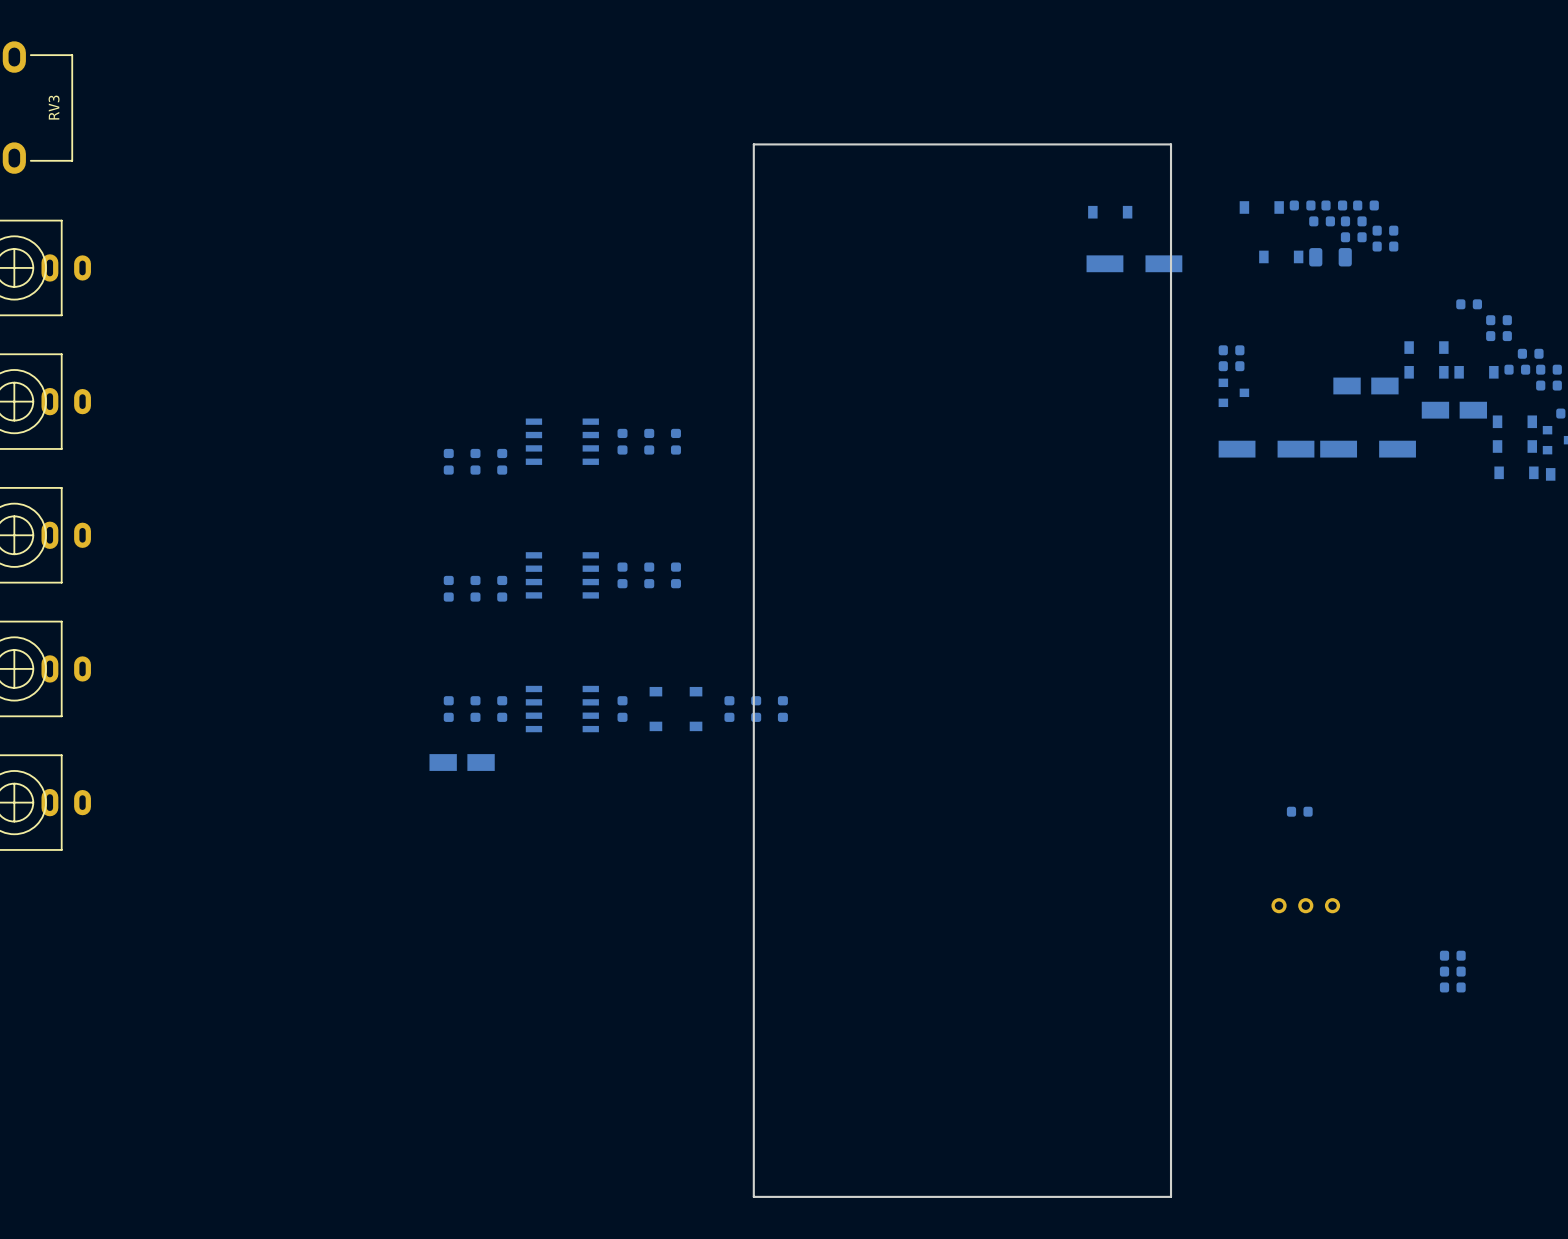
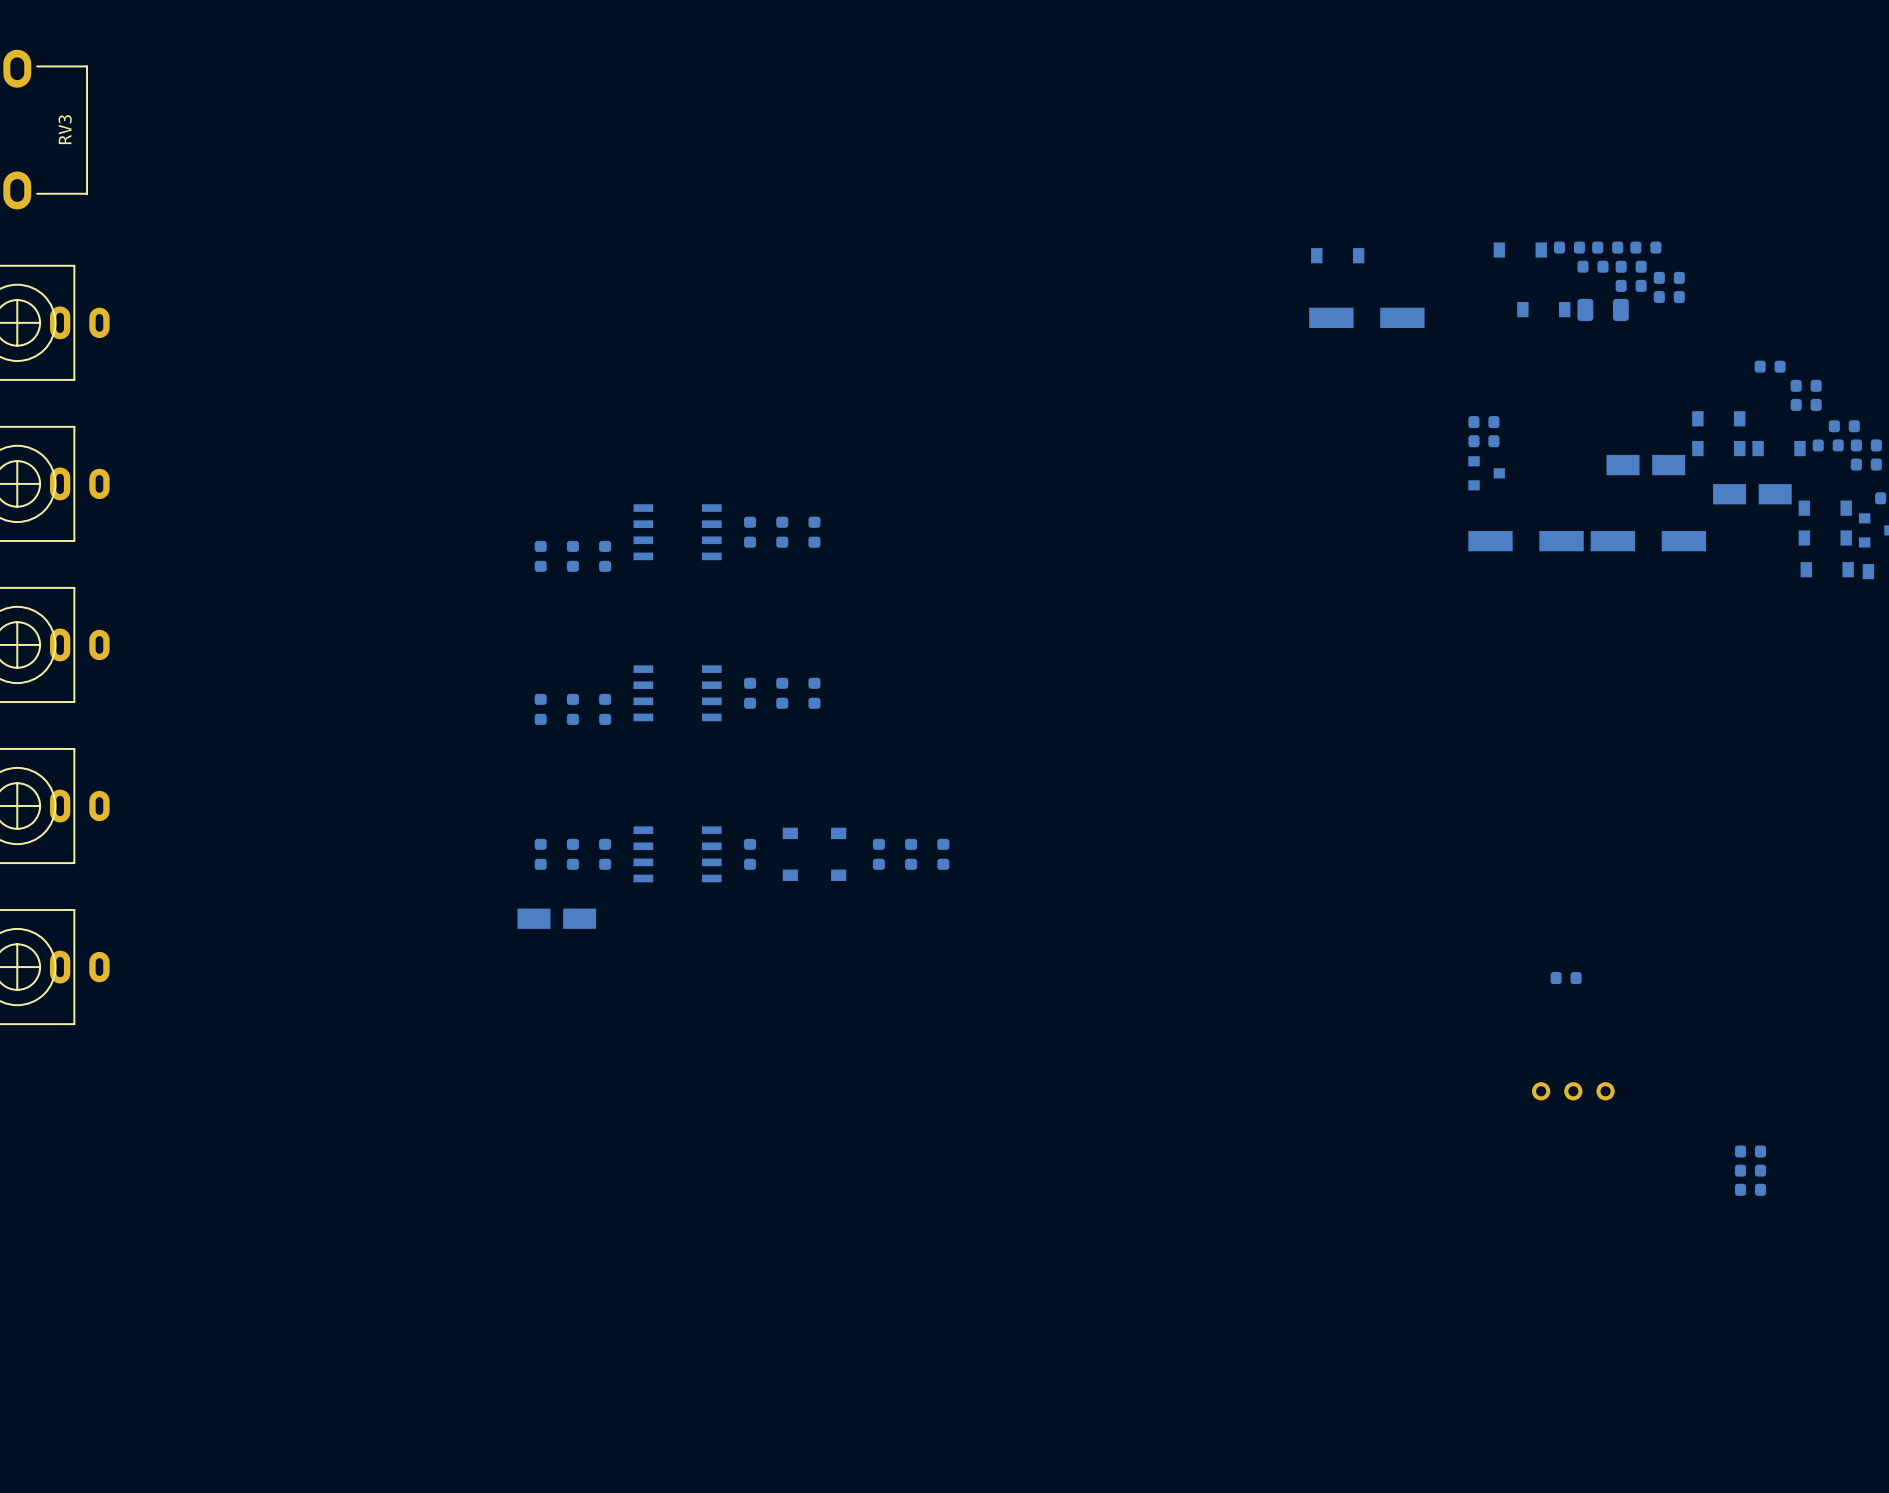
board edge: (753, 144) (753, 1196) (1171, 1196) (1171, 144) (753, 144) -> none

